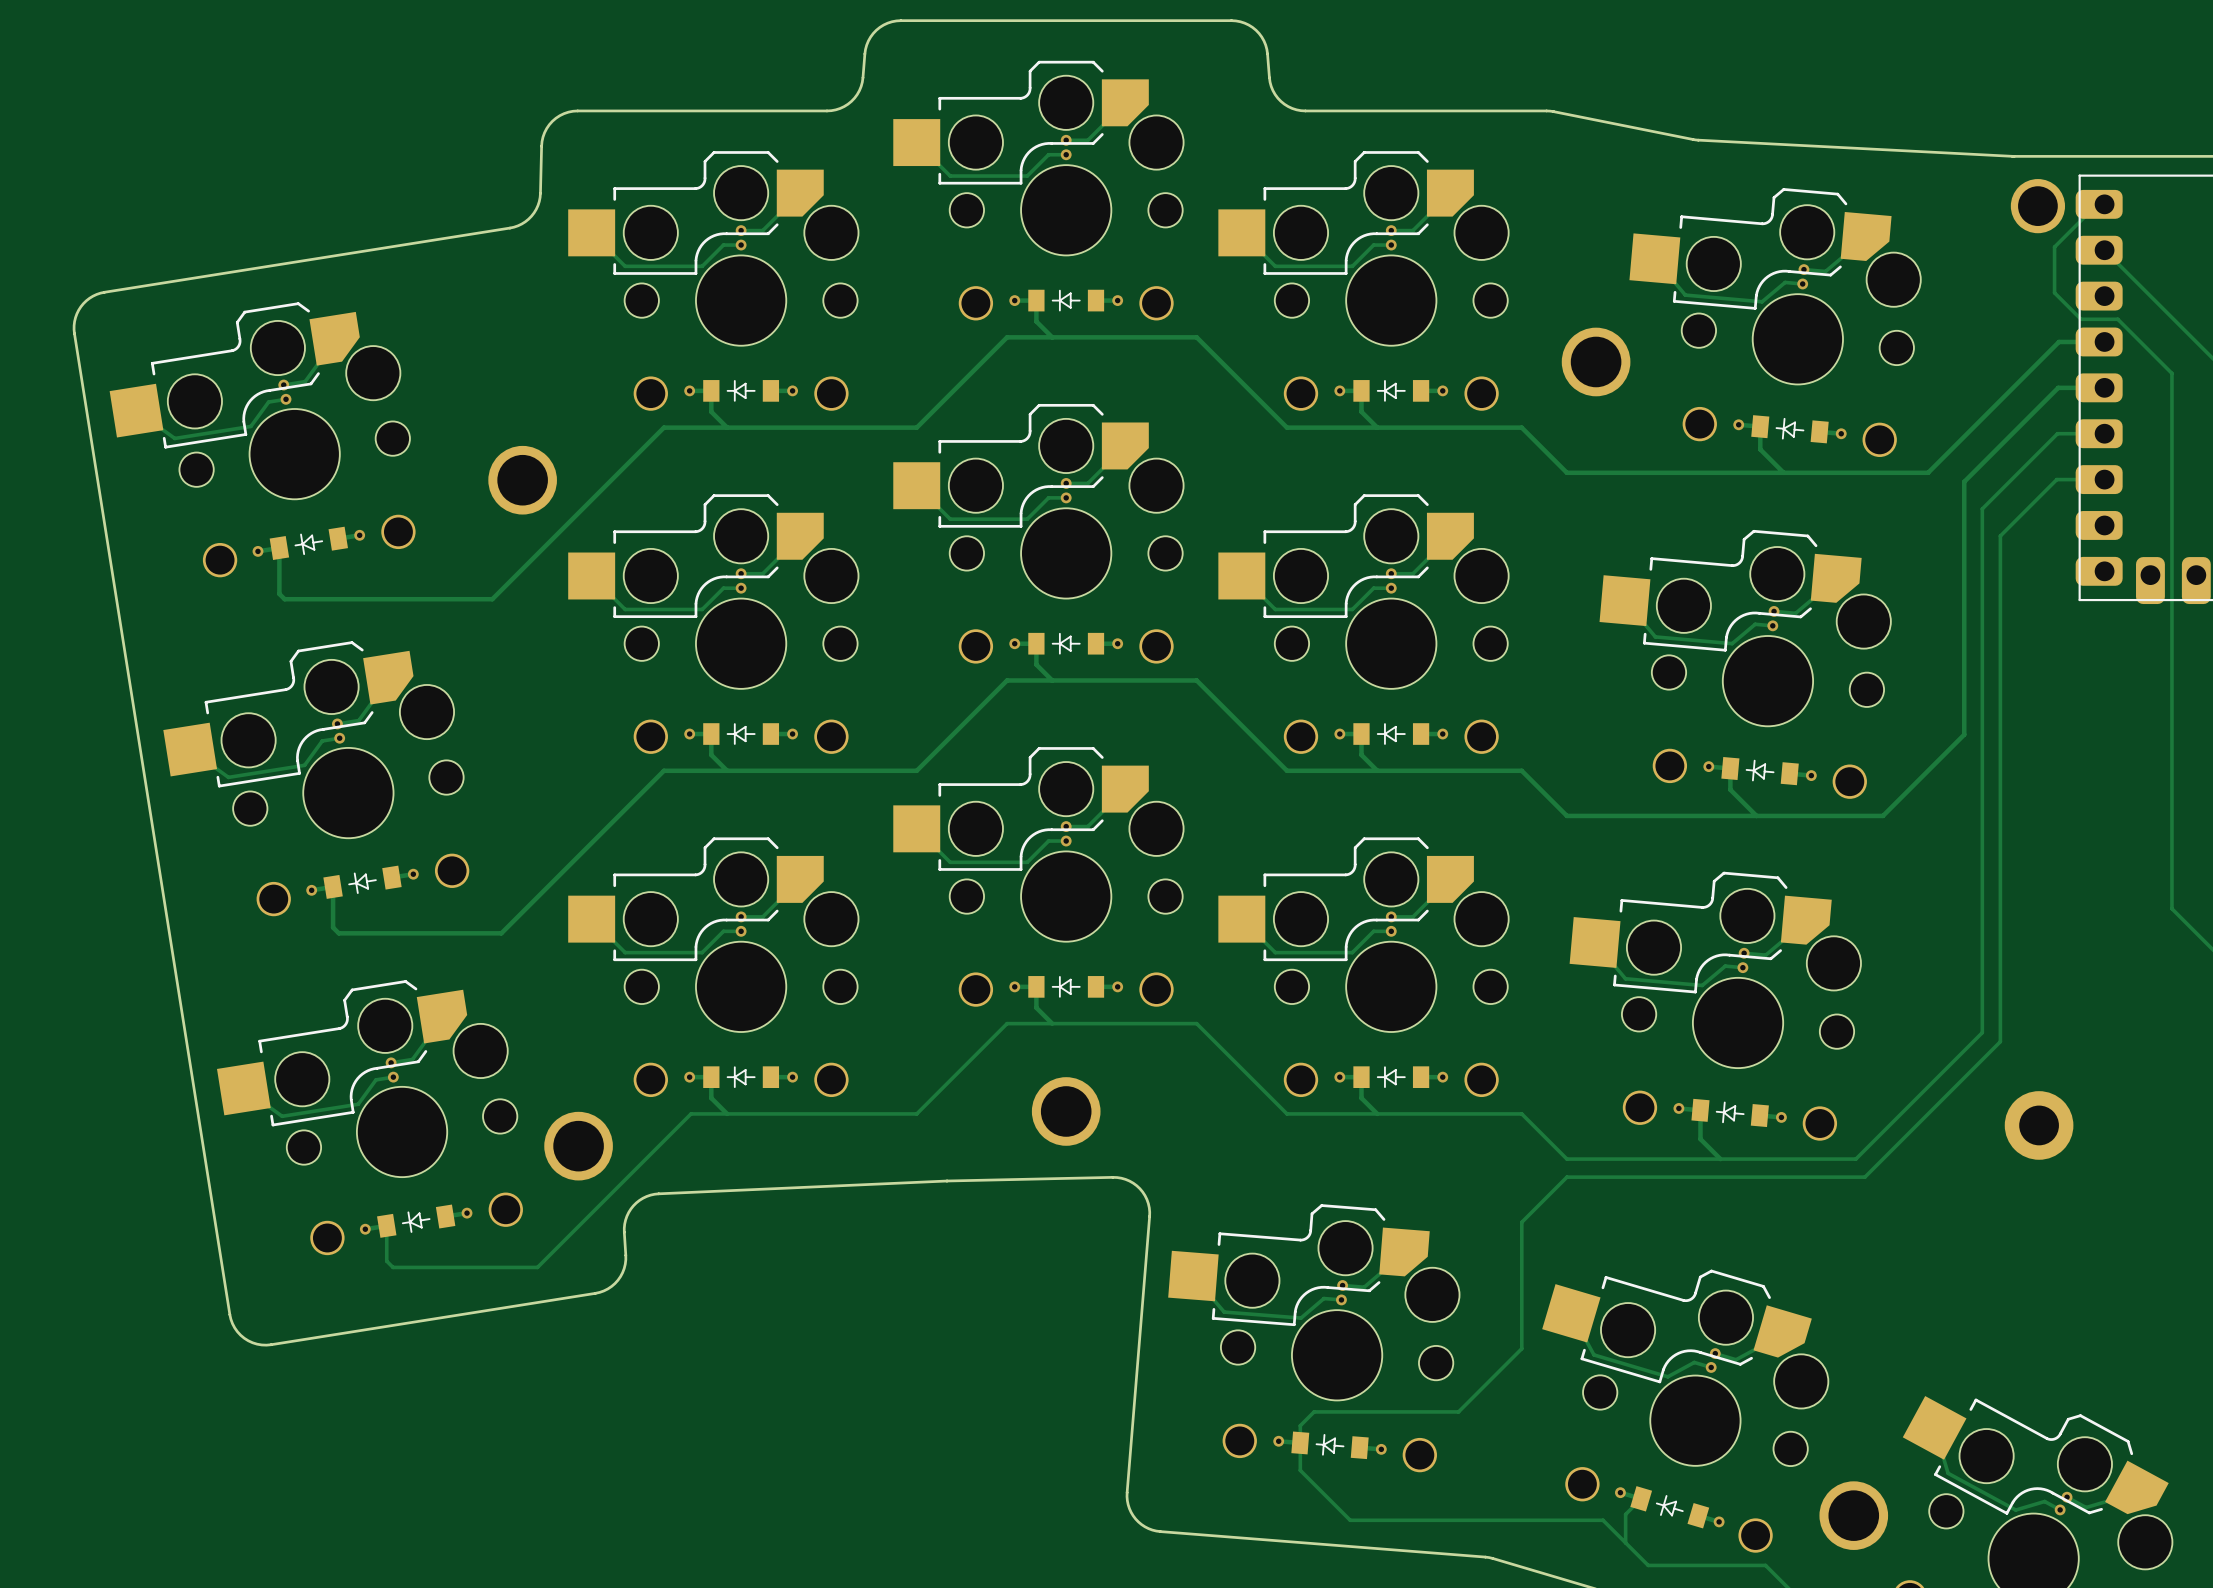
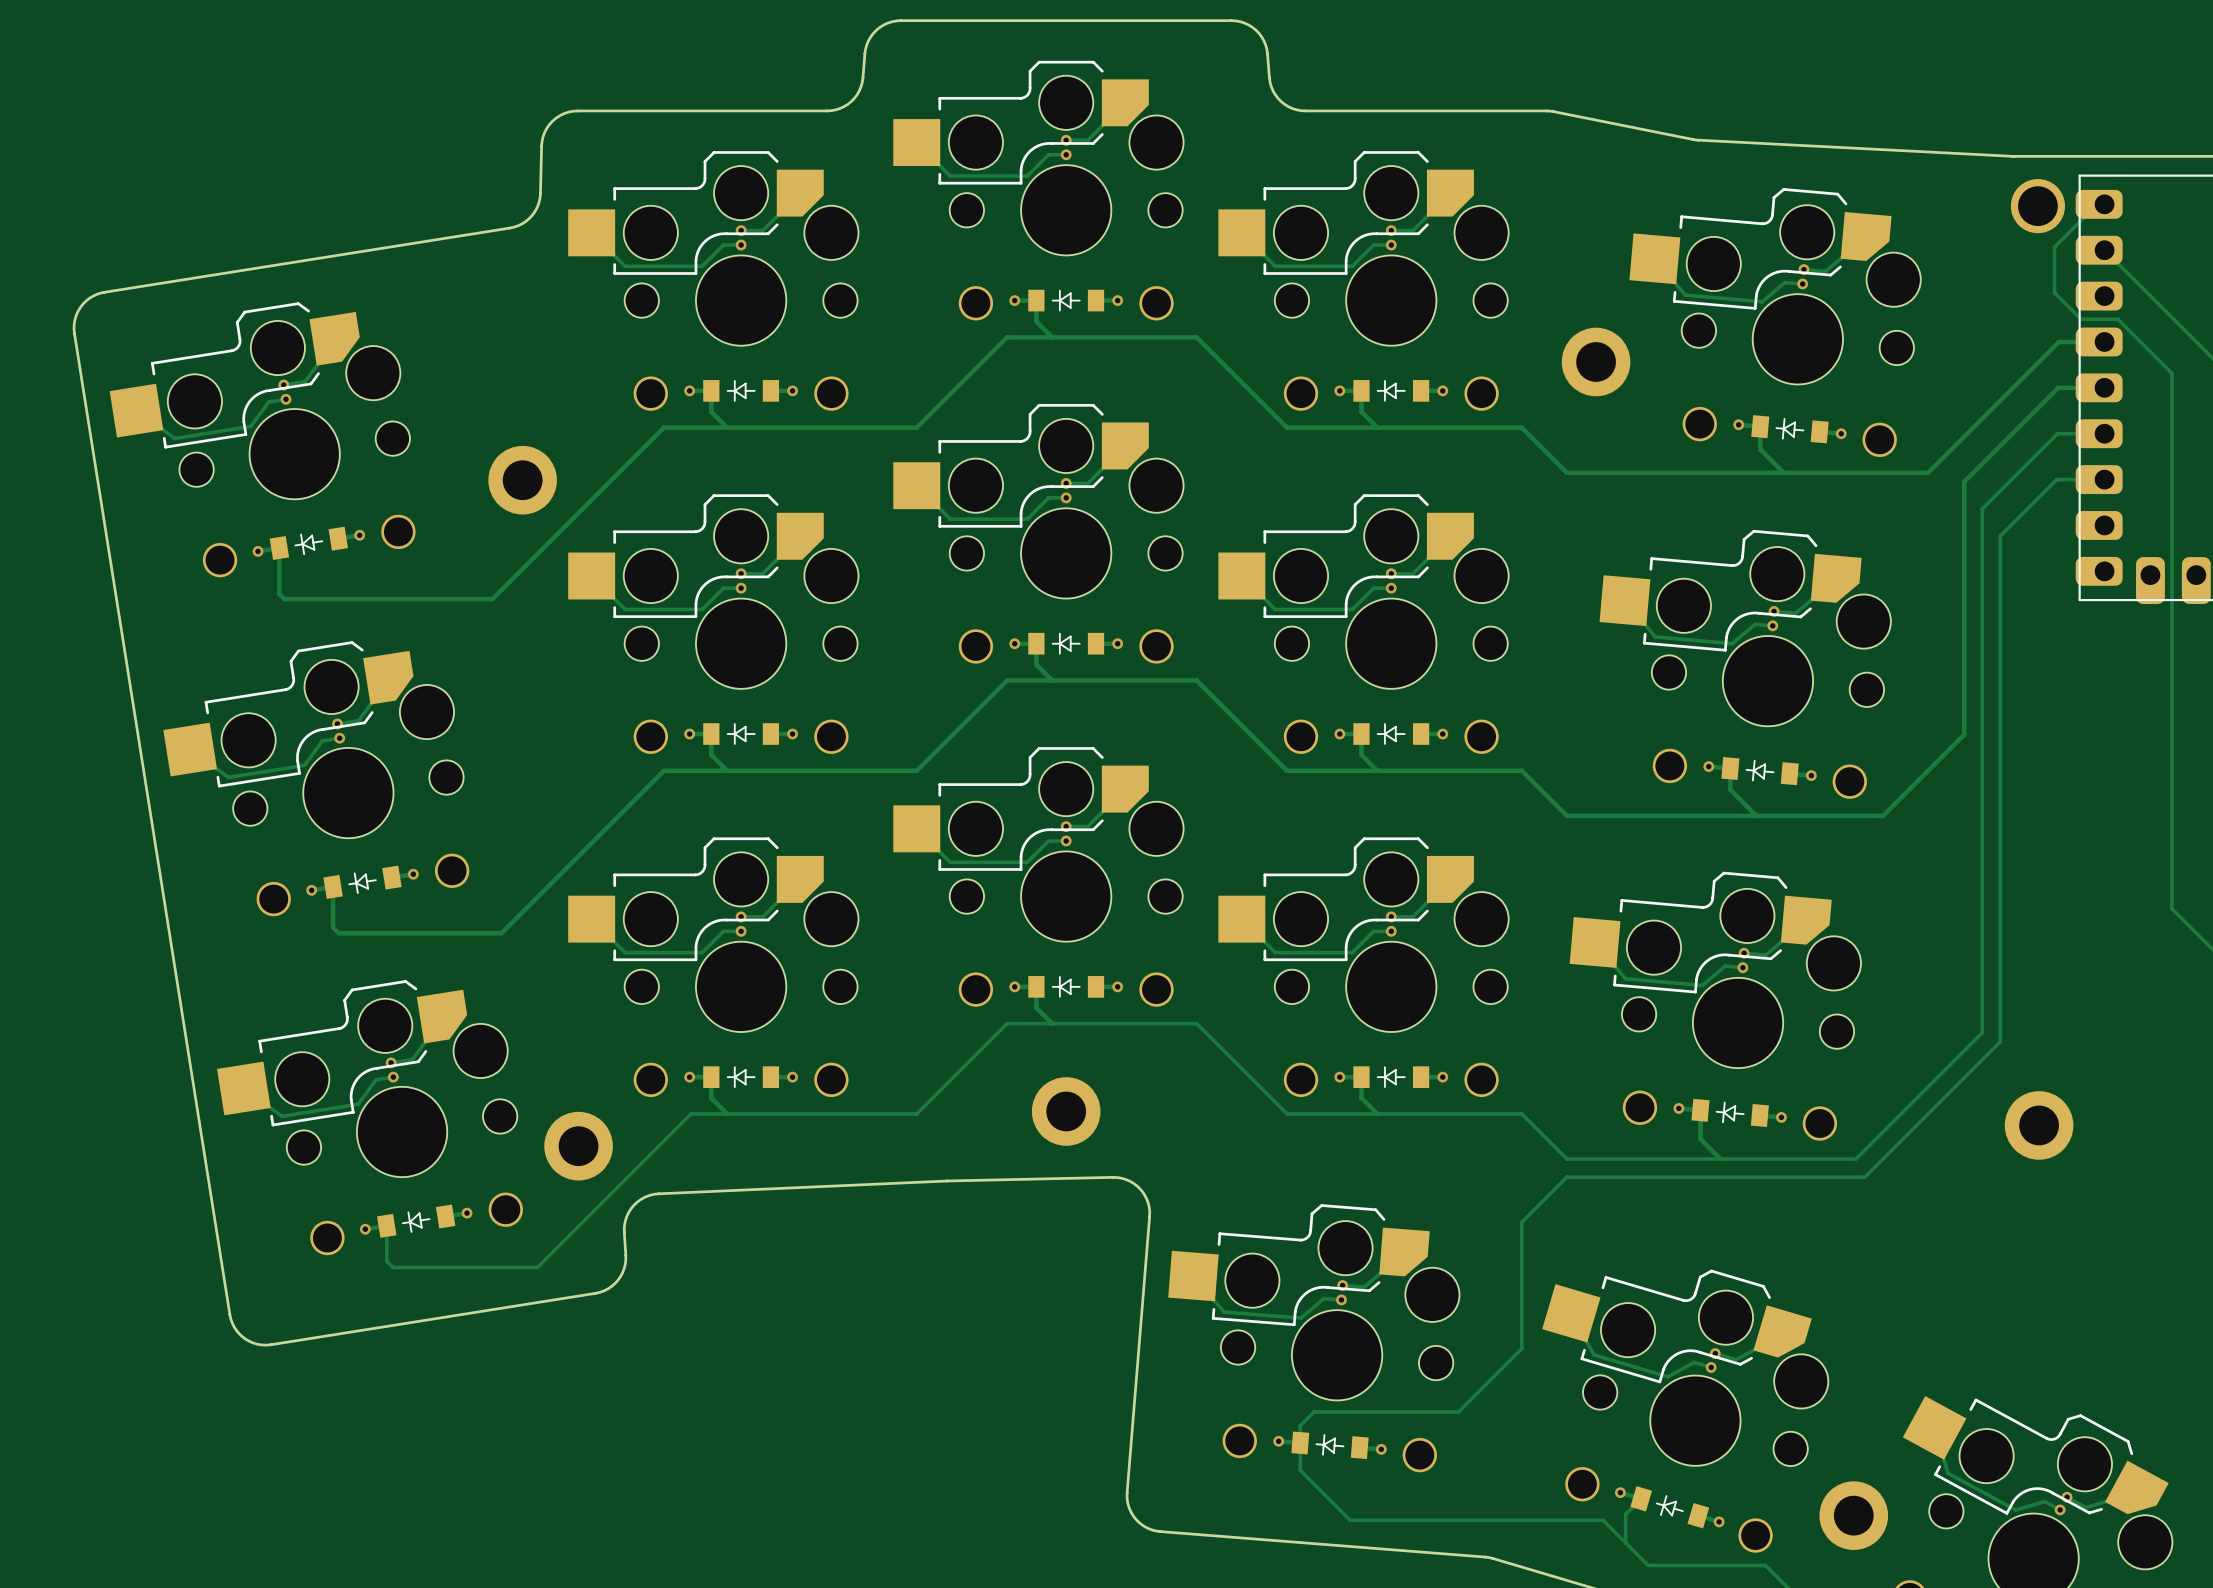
part footprint: [1561, 327, 1631, 397] -> [1561, 327, 1631, 397]
part footprint: [488, 445, 557, 515] -> [488, 445, 557, 515]
part footprint: [1031, 1077, 1101, 1146] -> [1031, 1077, 1101, 1146]
part footprint: [544, 1111, 613, 1181] -> [544, 1111, 613, 1181]
part footprint: [1819, 1481, 1889, 1550] -> [1819, 1481, 1889, 1550]

